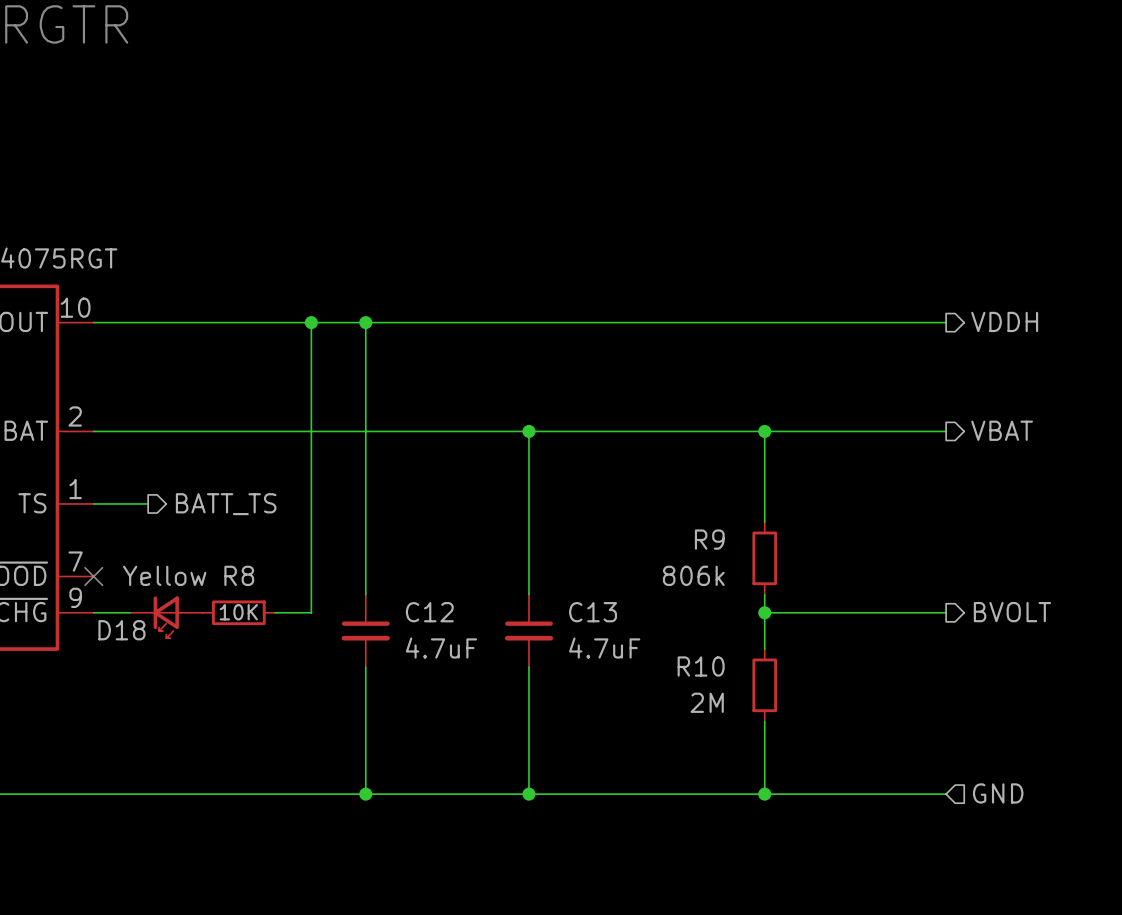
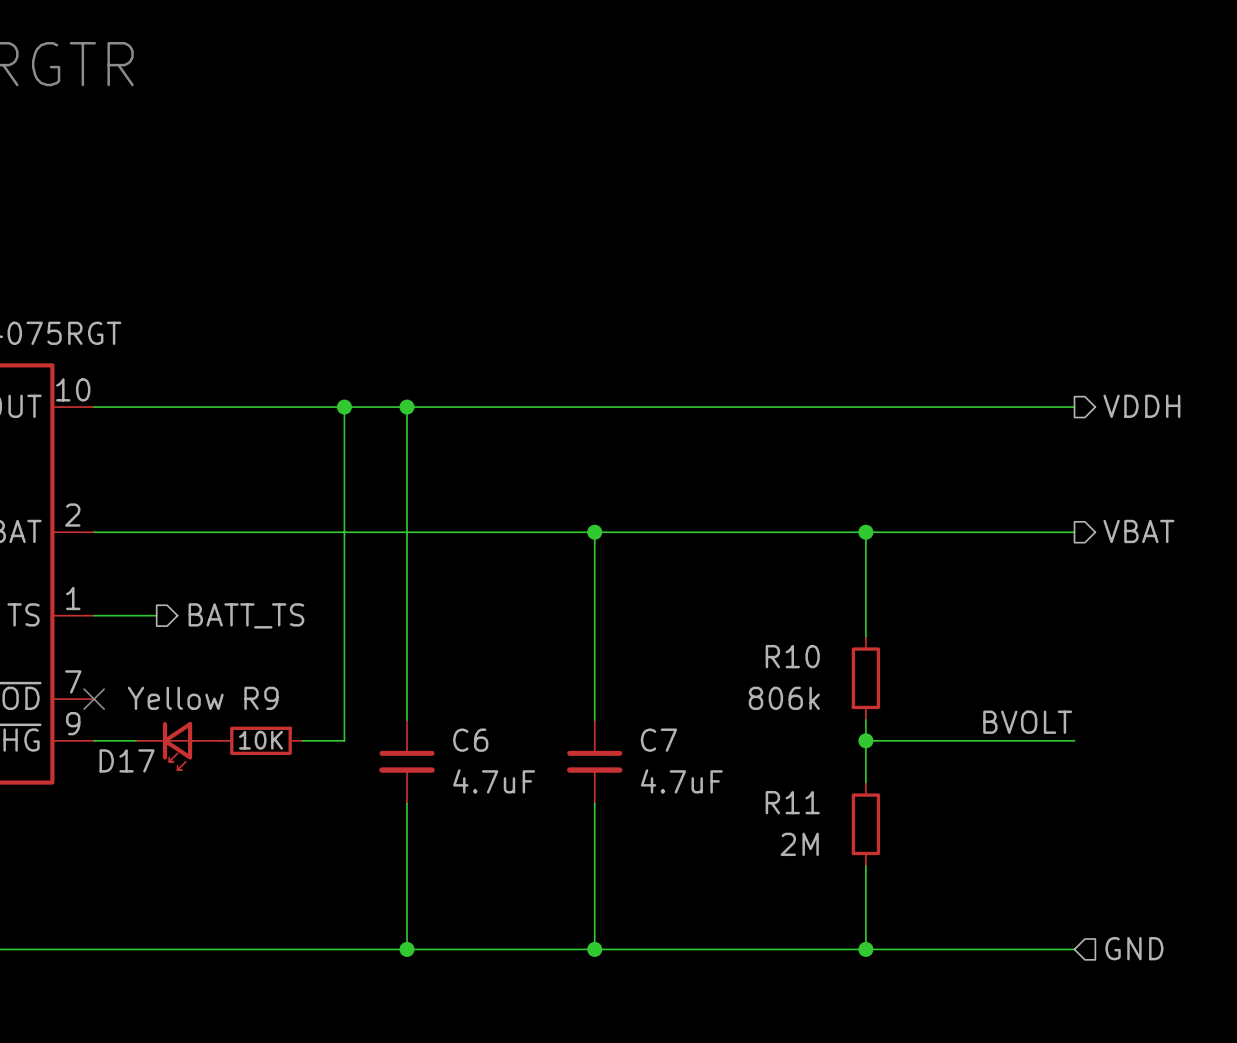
R9 name: R9 (709, 539) -> R10 (792, 656)
R8 name: R8 (239, 575) -> R9 (261, 698)
label: none -> BVOLT (1027, 722)
C12 name: C12 (429, 612) -> C6 (470, 740)
C13 name: C13 (593, 612) -> C7 (658, 740)
hierarchical label: BVOLT (1012, 612) -> none
D18 name: D18 (121, 630) -> D17 (127, 760)
R10 name: R10 (701, 666) -> R11 (792, 802)

